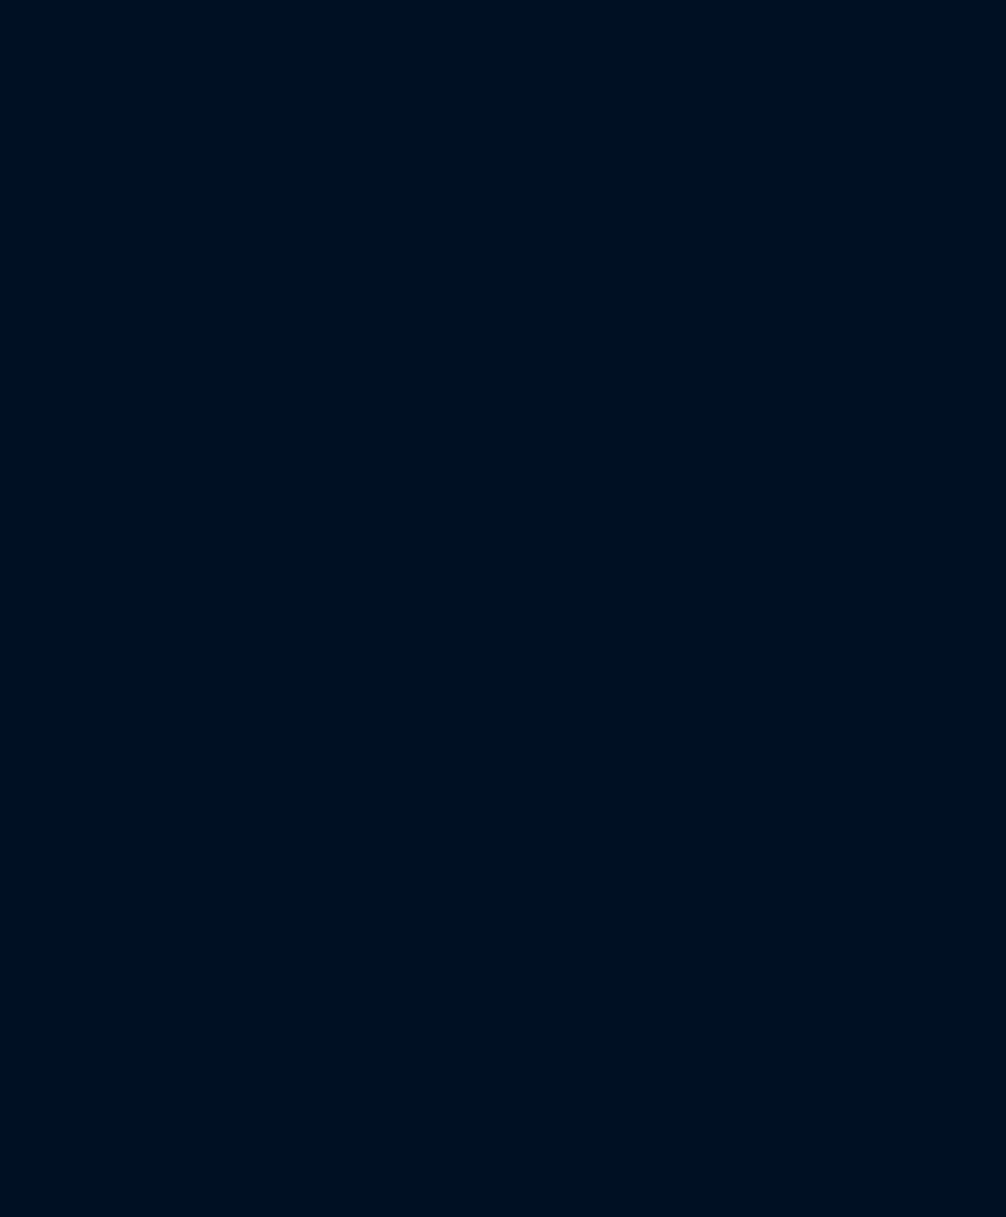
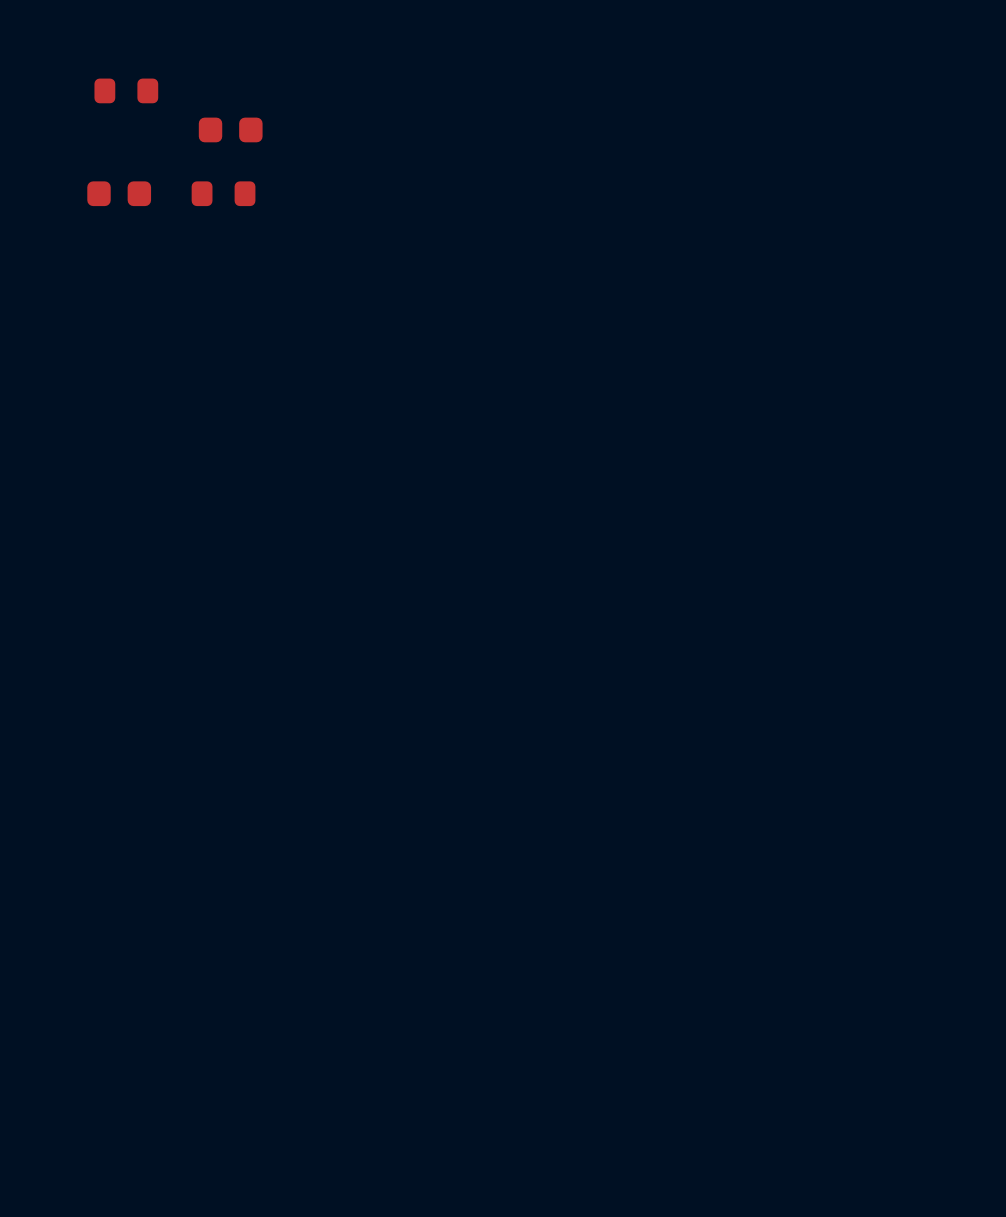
part: none -> (126, 90)
part: none -> (230, 129)
part: none -> (119, 193)
part: none -> (223, 193)

